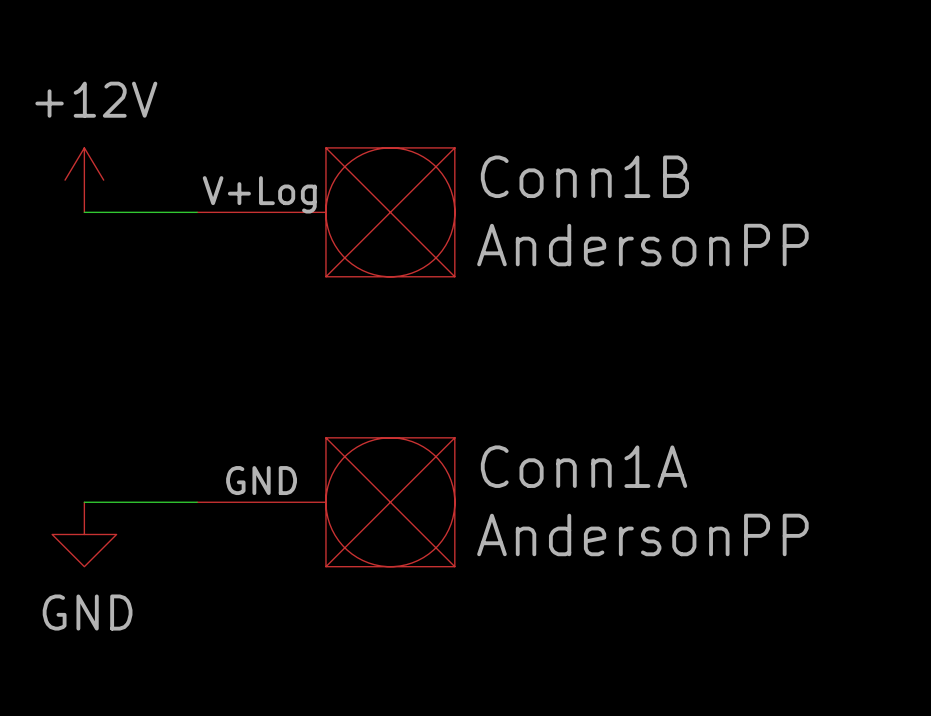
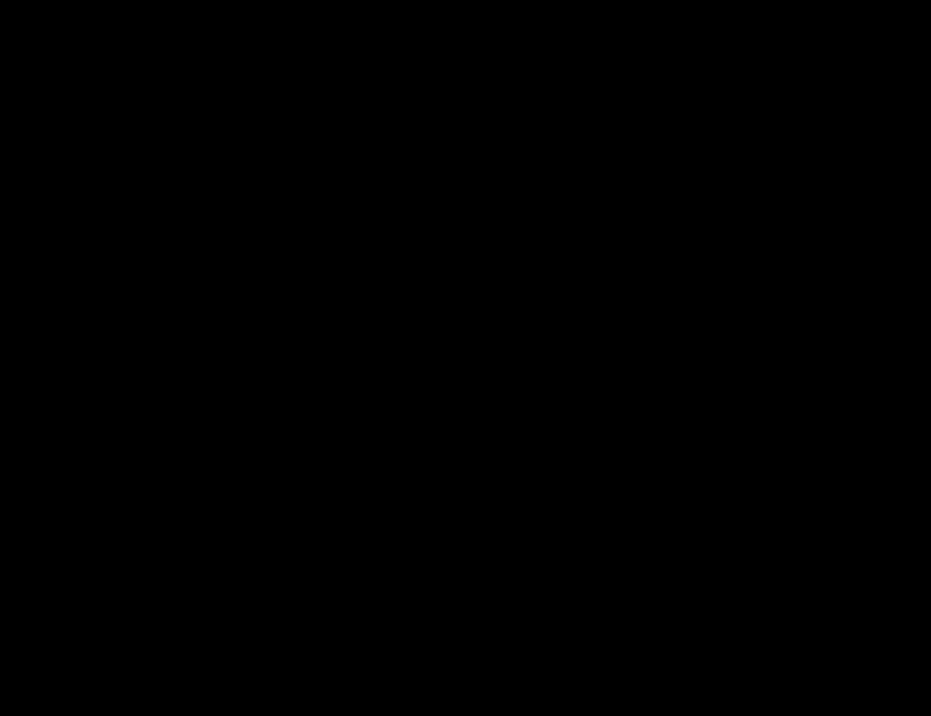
power symbol: +12V (84, 180) -> none
wire: (84, 212) (197, 212) -> none
Conn1B: AndersonPP (325, 212) -> none
wire: (84, 502) (197, 502) -> none
Conn1A: AndersonPP (325, 502) -> none
power symbol: GND (84, 534) -> none

